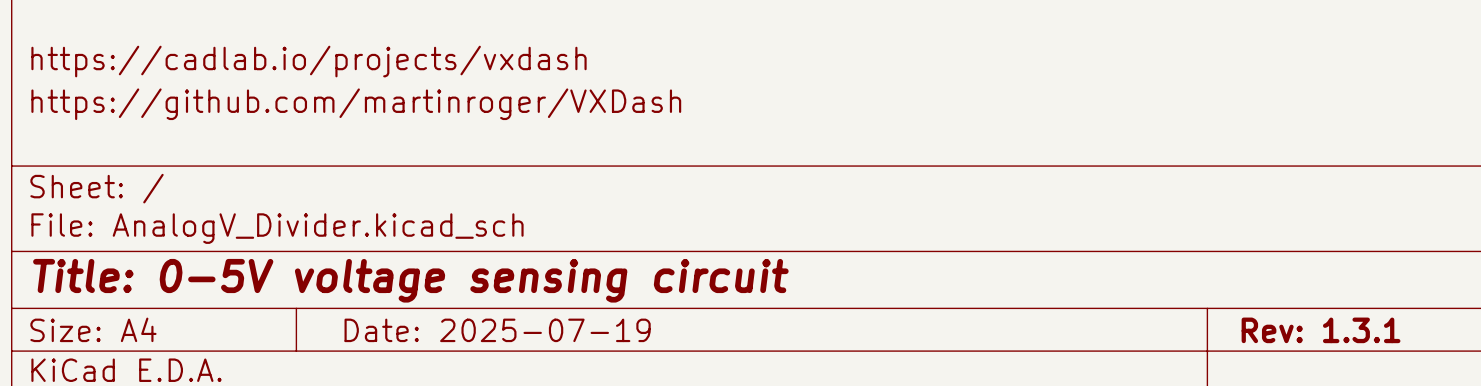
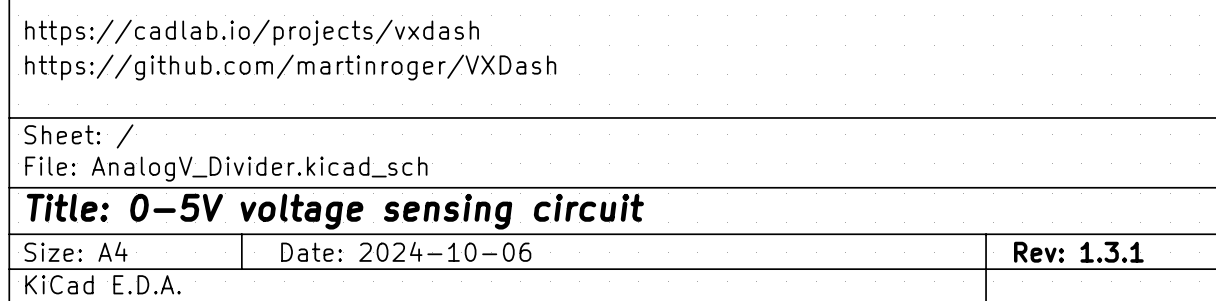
title block: Date: 2025-07-19 (497, 330) -> Date: 2024-10-06 (406, 251)

